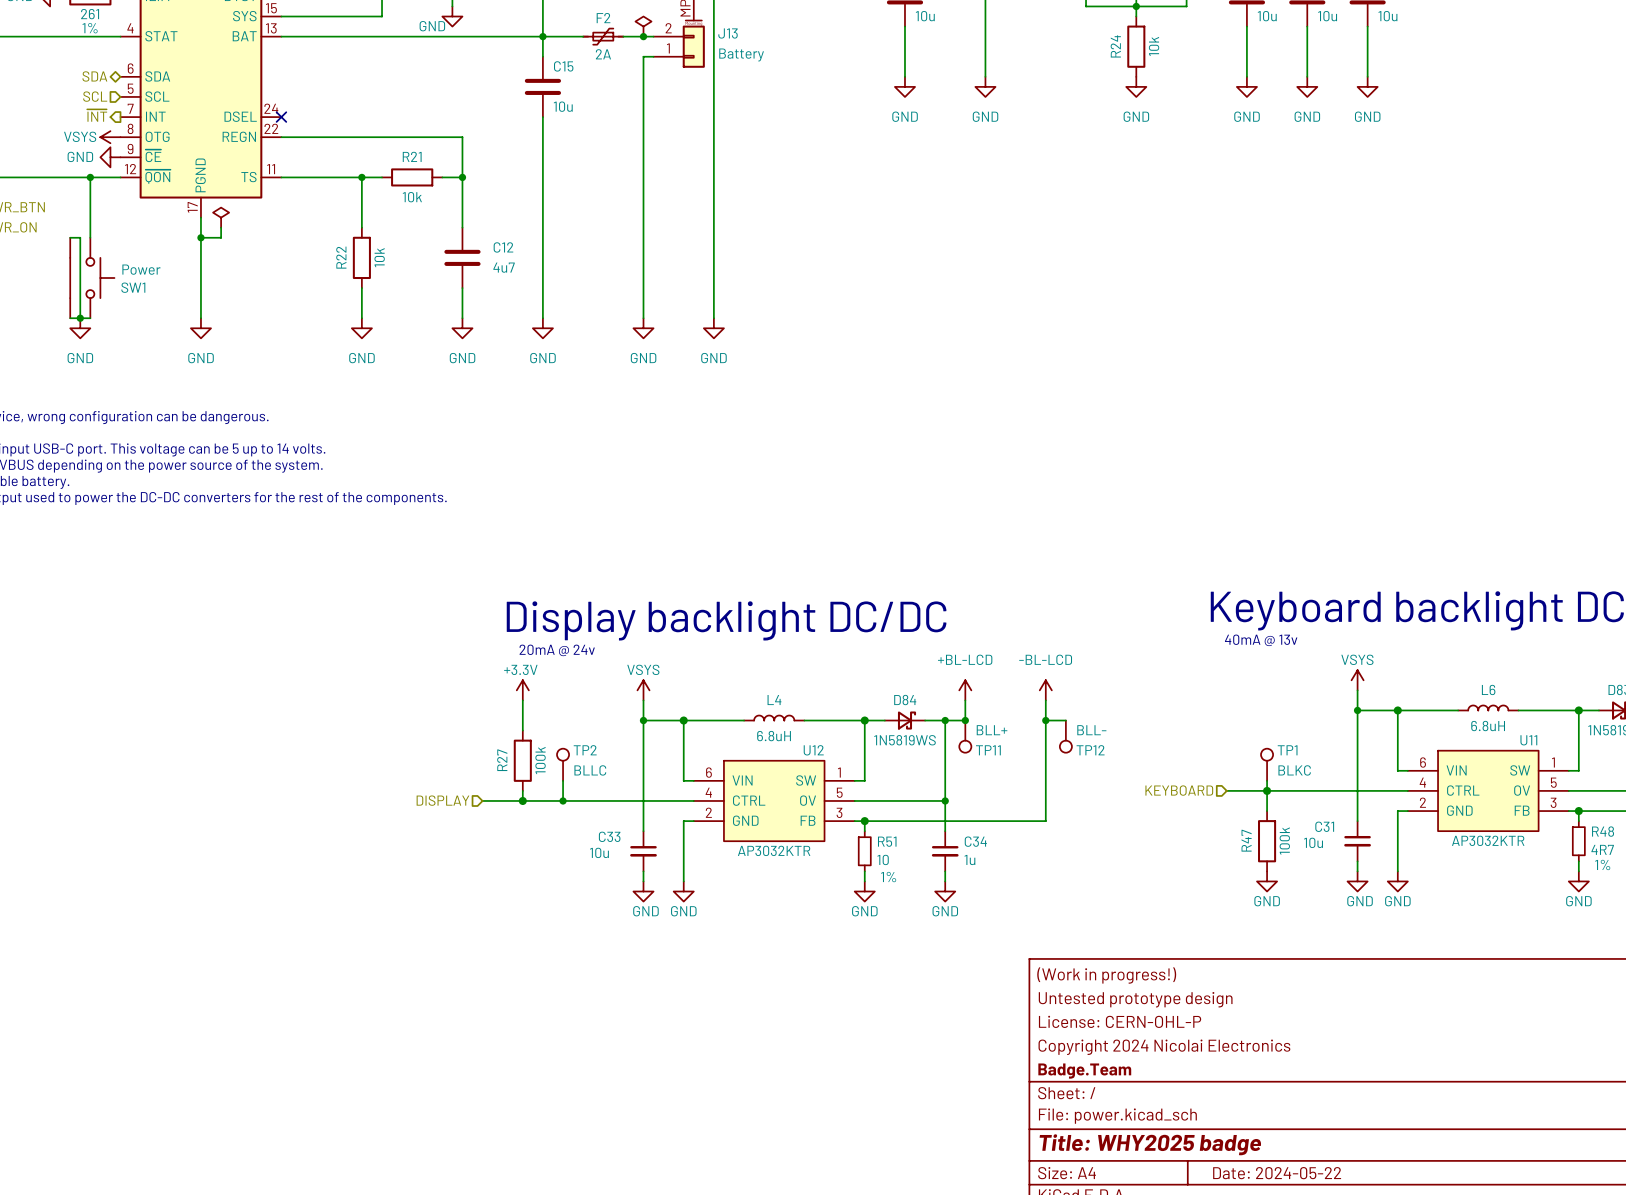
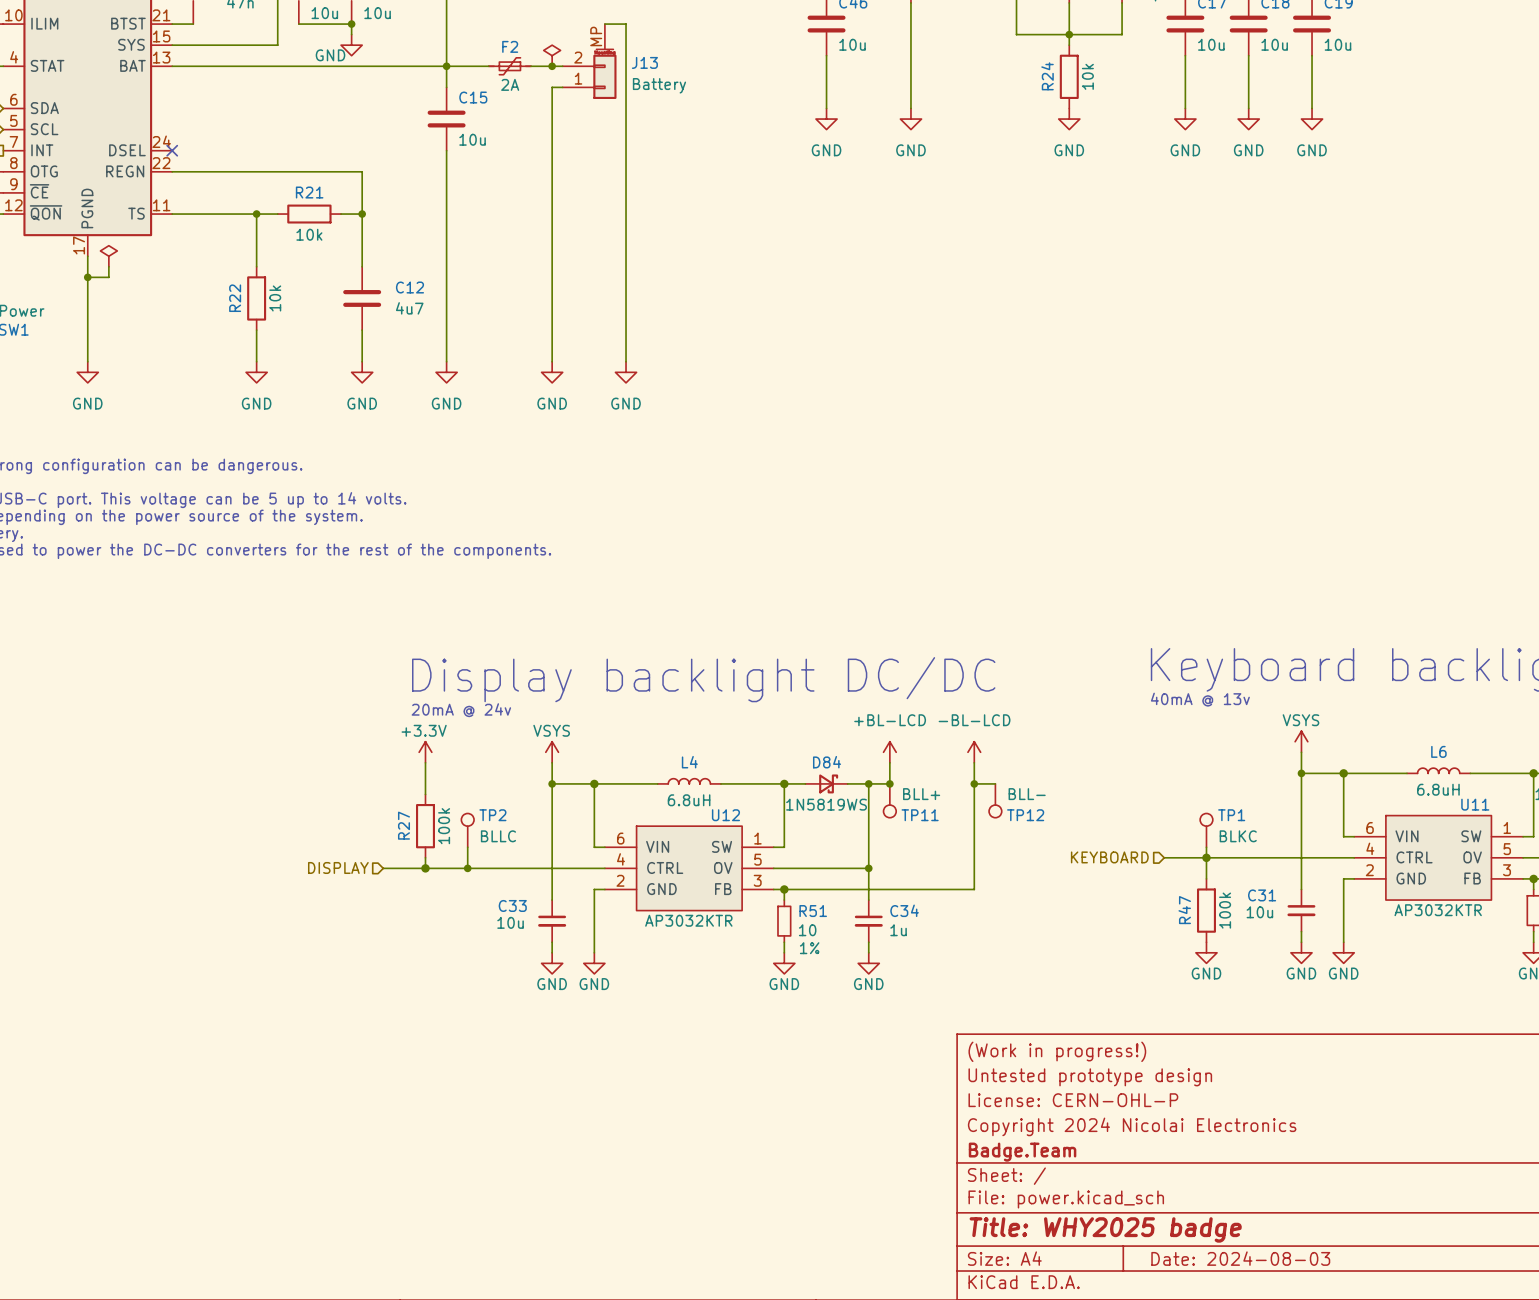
title block: Date: 2024-05-22 (1277, 1173) -> Date: 2024-08-03 (1240, 1258)

